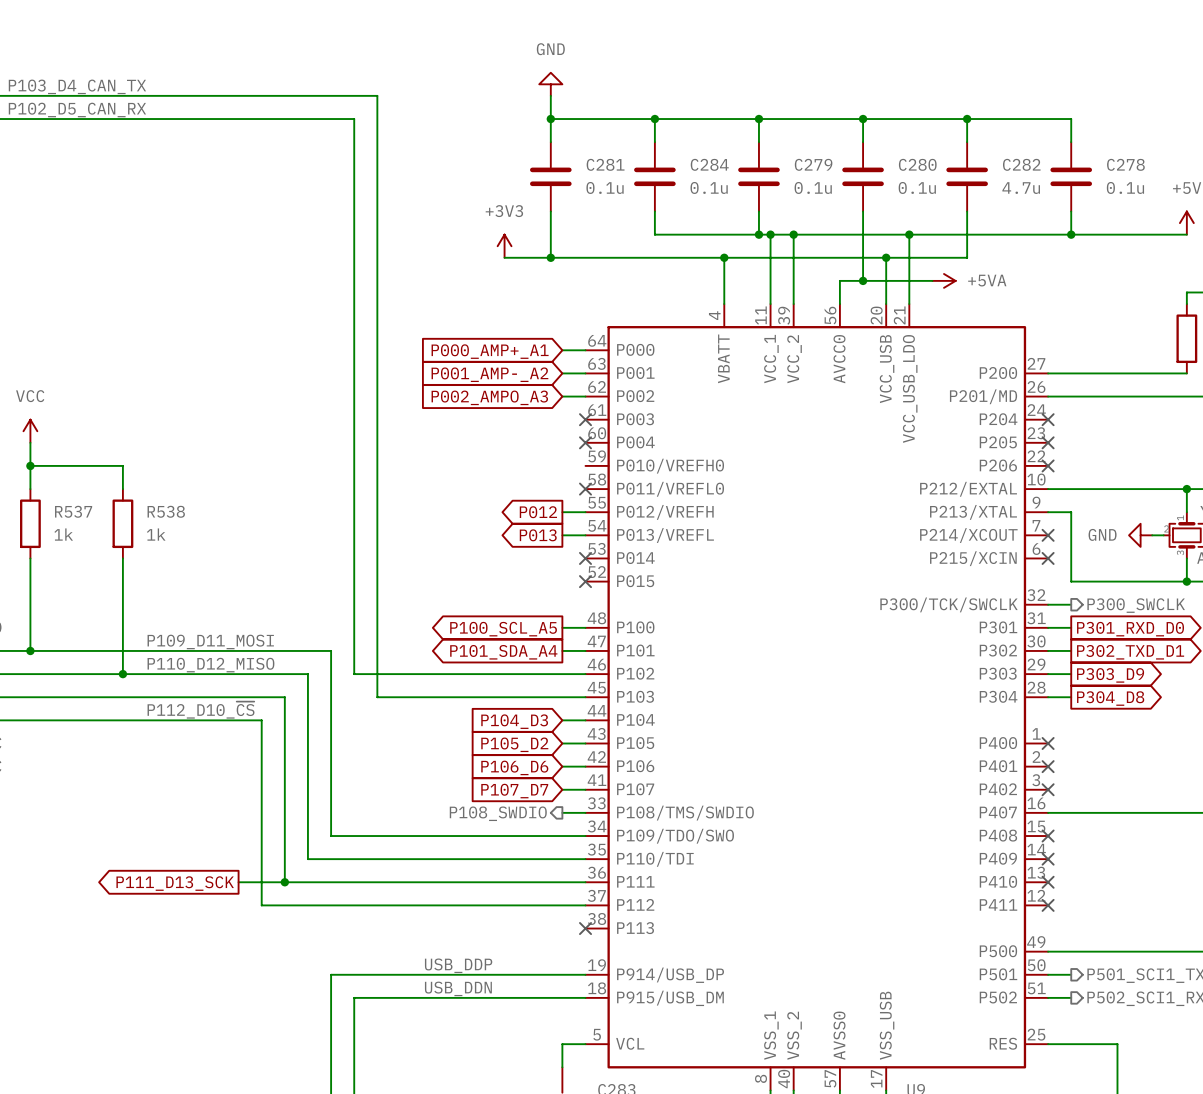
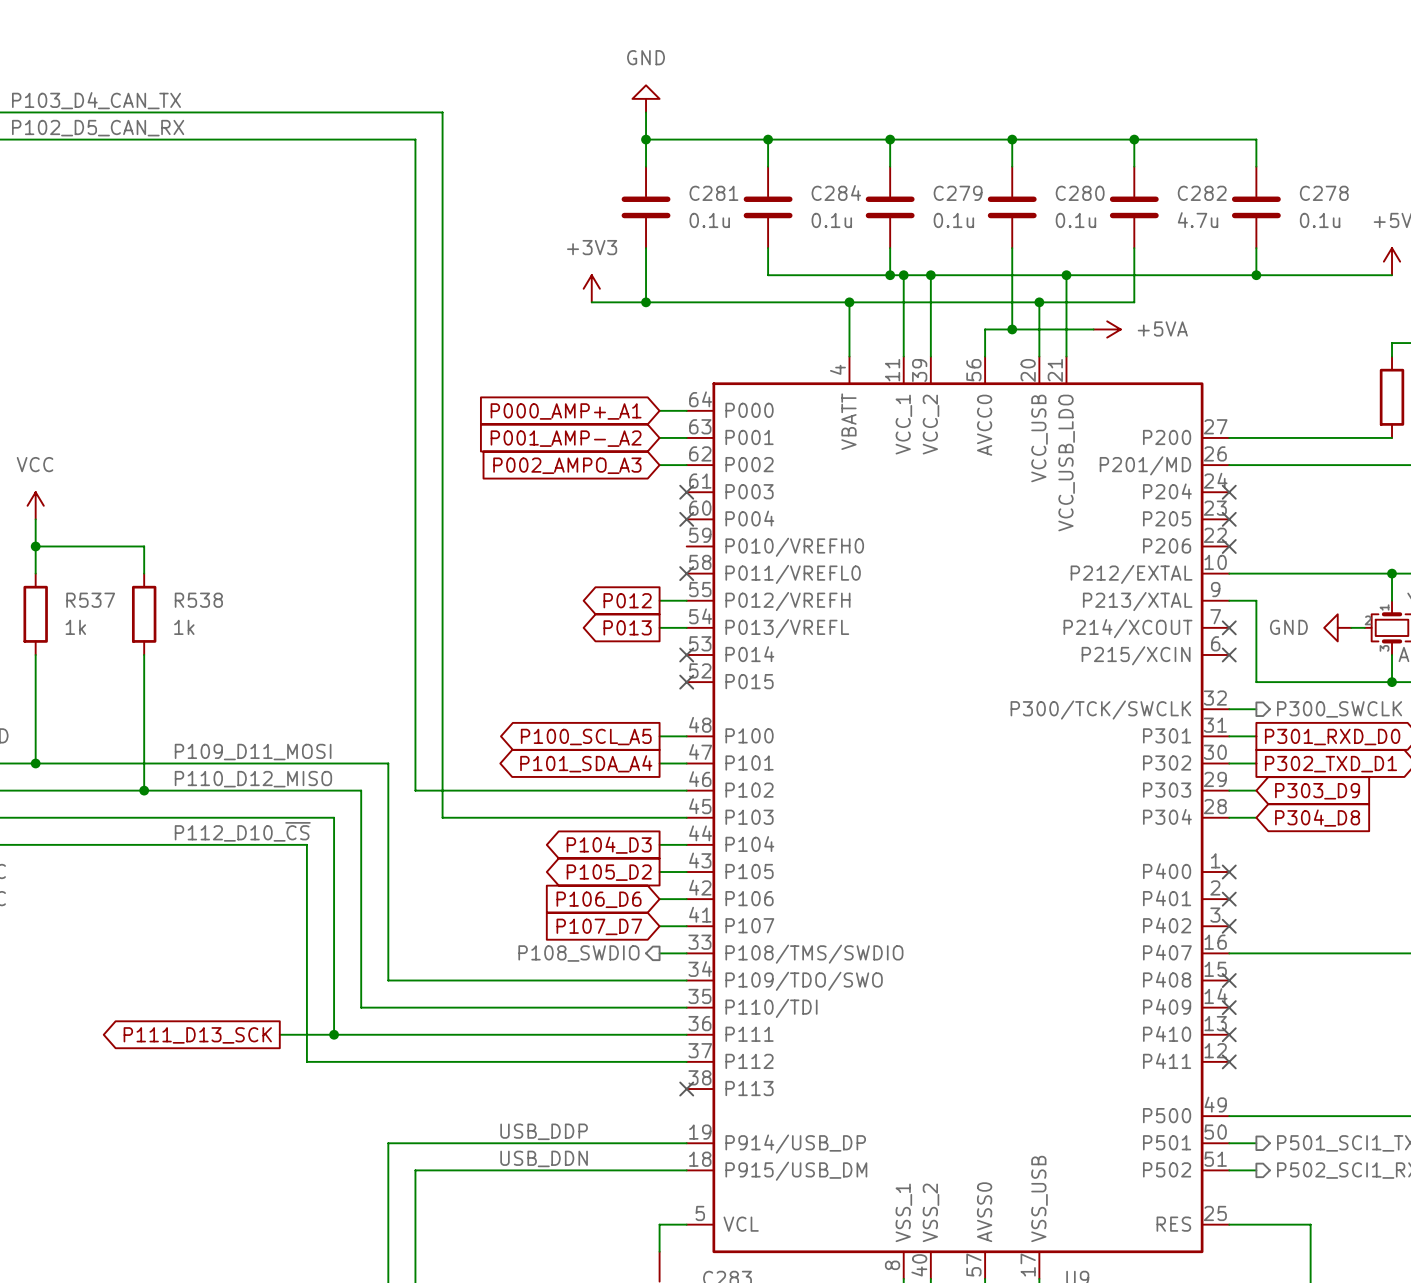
global label shape: output (1110, 675) -> input (1317, 791)
global label shape: output (1110, 698) -> input (1317, 818)
global label shape: input (514, 721) -> output (609, 845)
global label shape: input (514, 744) -> output (609, 872)

